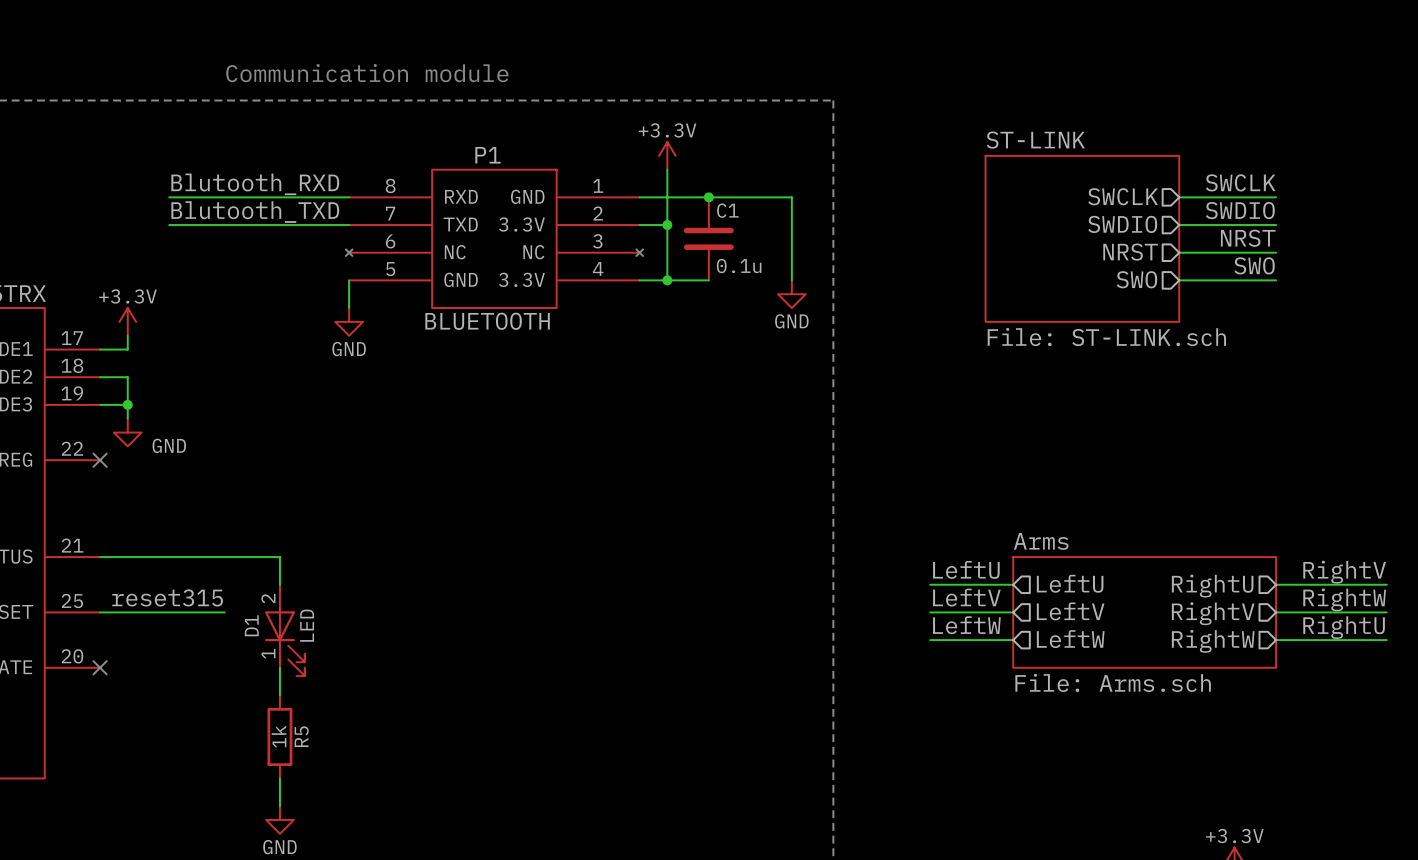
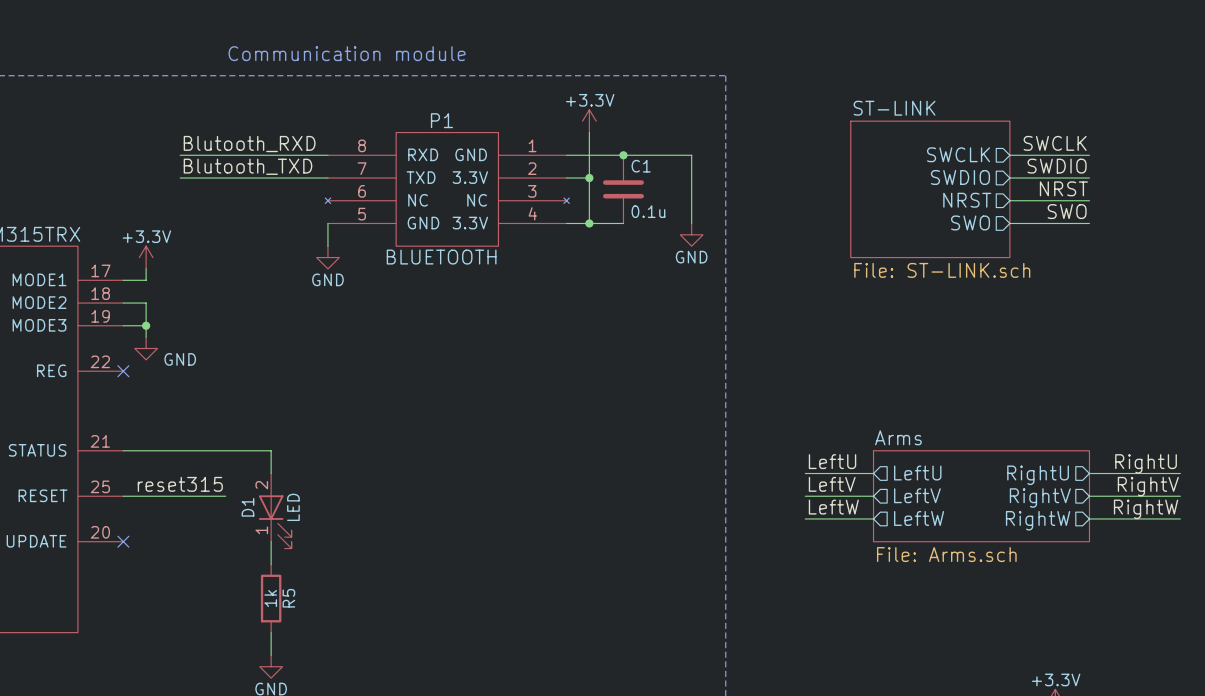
label: RightV (1344, 572) -> RightU (1146, 463)
label: RightW (1344, 599) -> RightV (1148, 486)
label: RightU (1344, 627) -> RightW (1146, 509)

